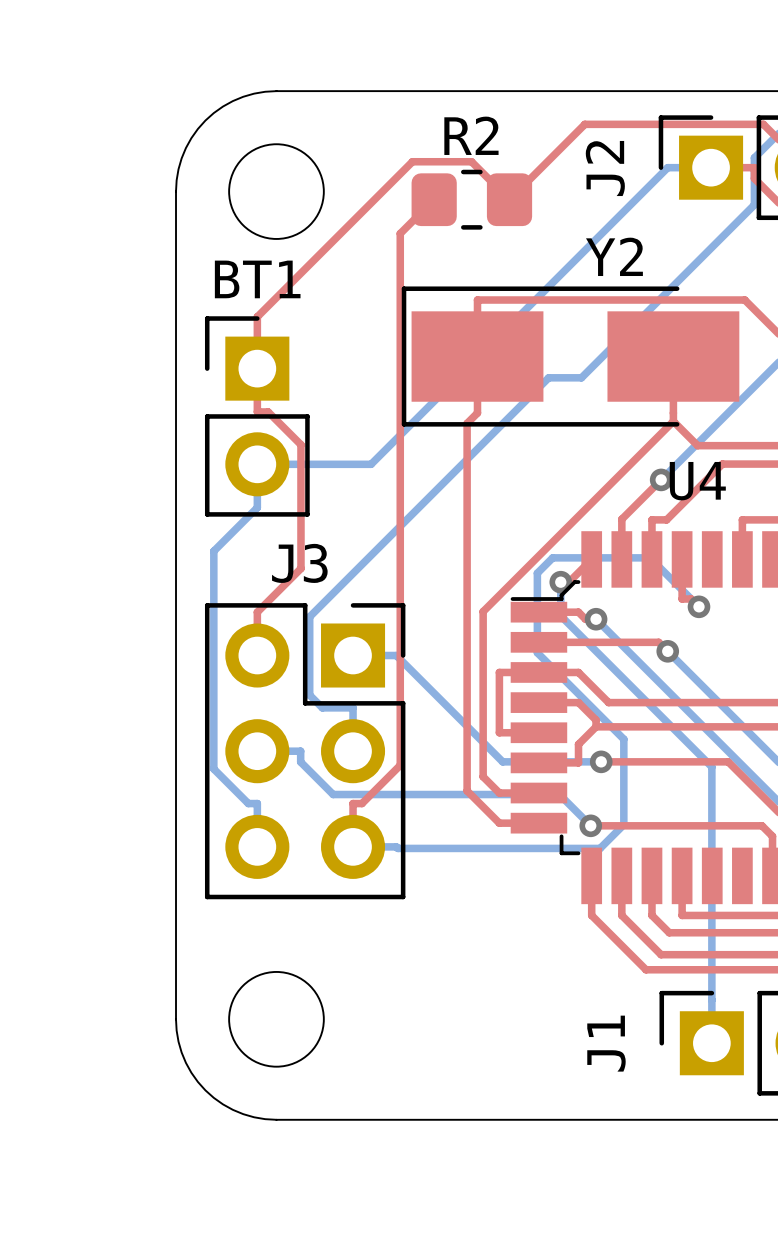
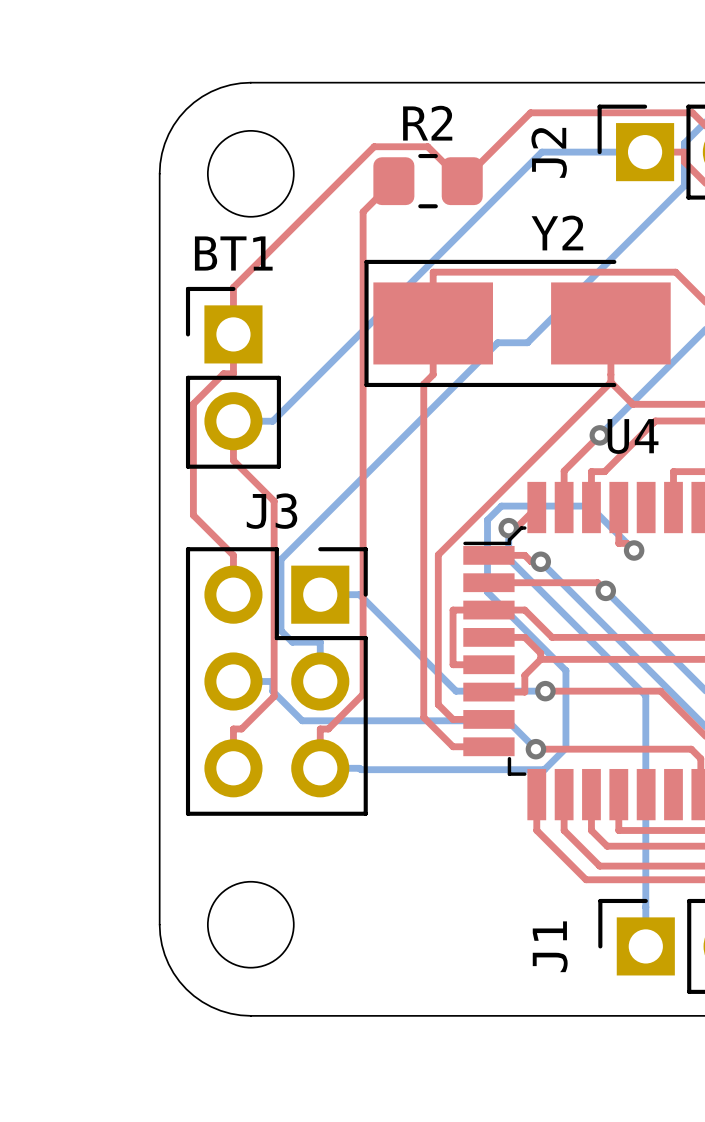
bottom track: (667, 167) (371, 464) (300, 464) -> (605, 152) (541, 152) (272, 421)
top track: (257, 411) (268, 411) (300, 444) (300, 568) (257, 612) -> (233, 373) (223, 373) (193, 403) (193, 515) (233, 555)
top track: none -> (233, 421) (233, 460) (274, 501) (274, 696) (241, 728) (233, 728) (233, 768)
bottom track: (257, 464) (257, 507) (213, 551) (213, 769) (248, 803) (257, 803) (257, 846) -> none

